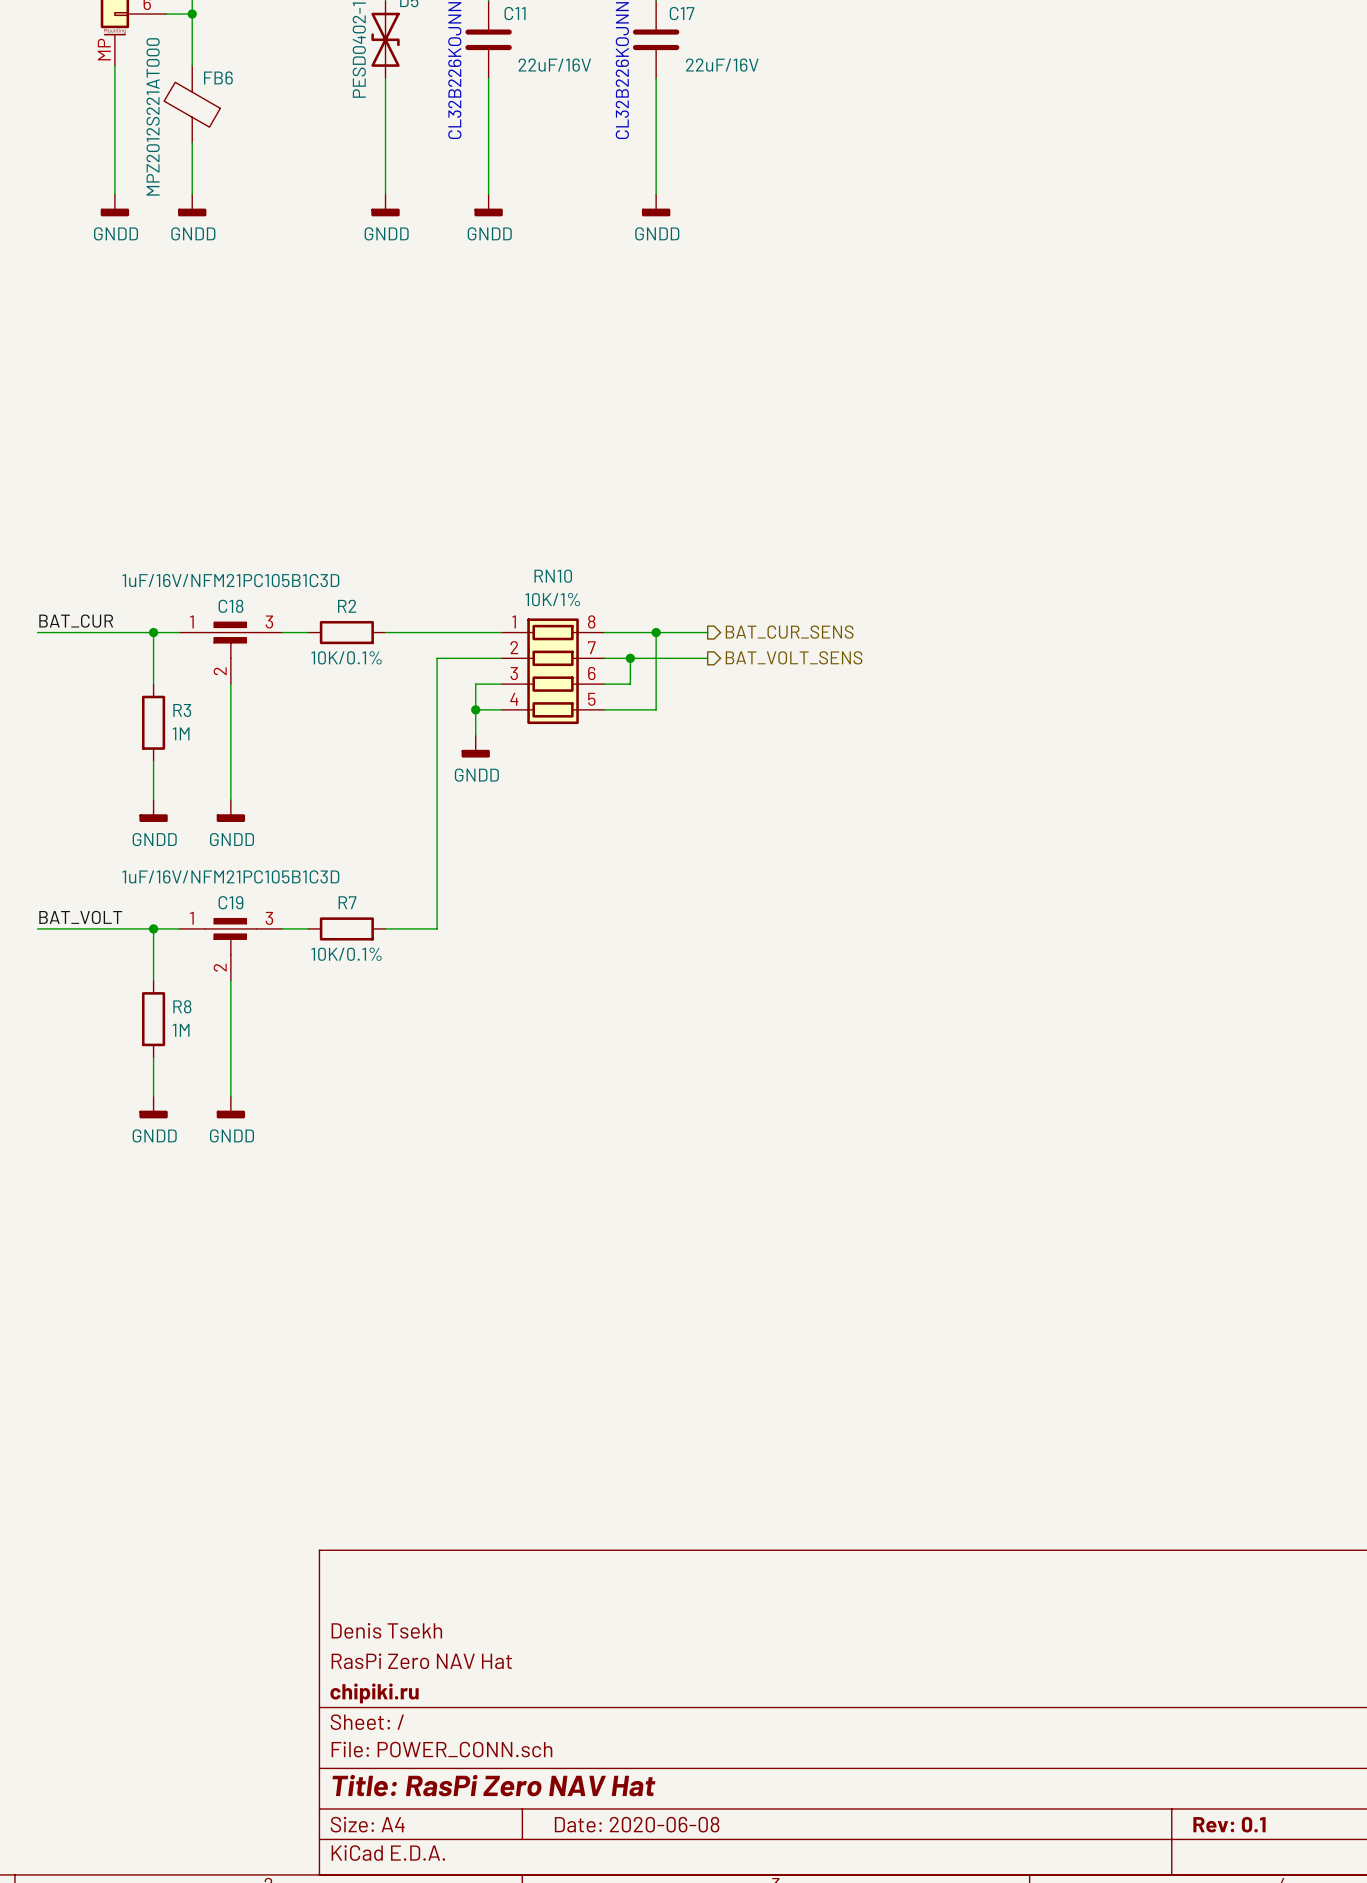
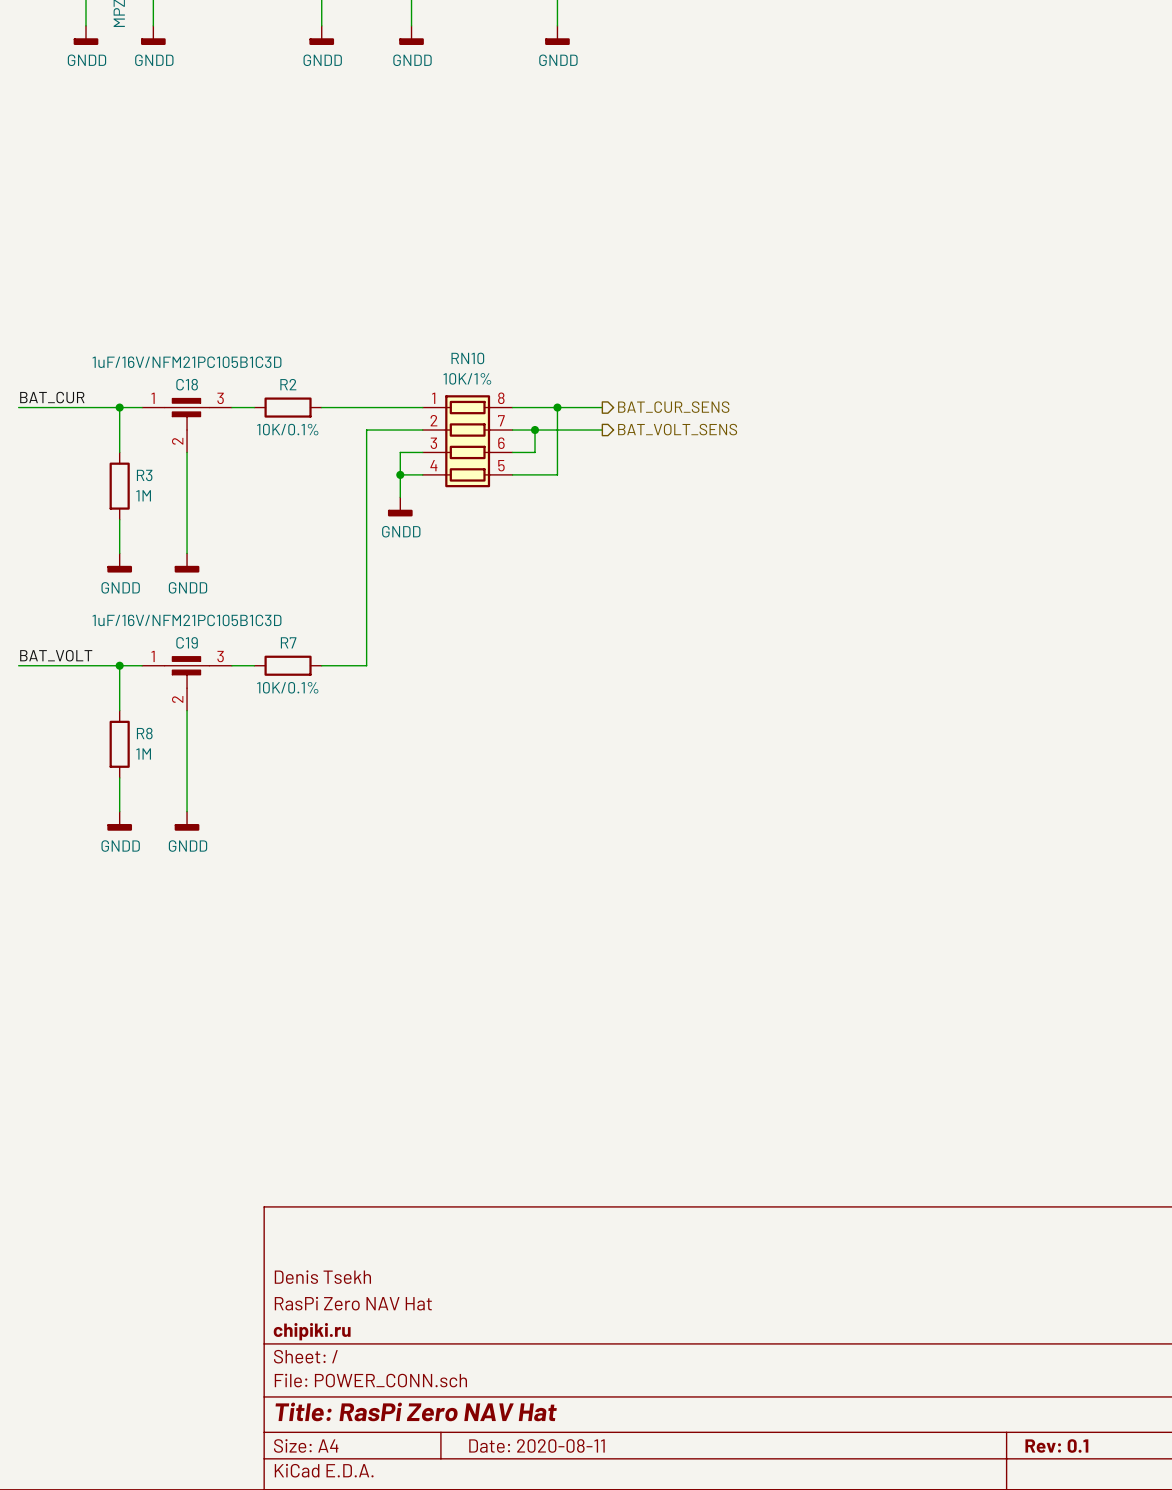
title block: Date: 2020-06-08 (637, 1824) -> Date: 2020-08-11 (536, 1445)

